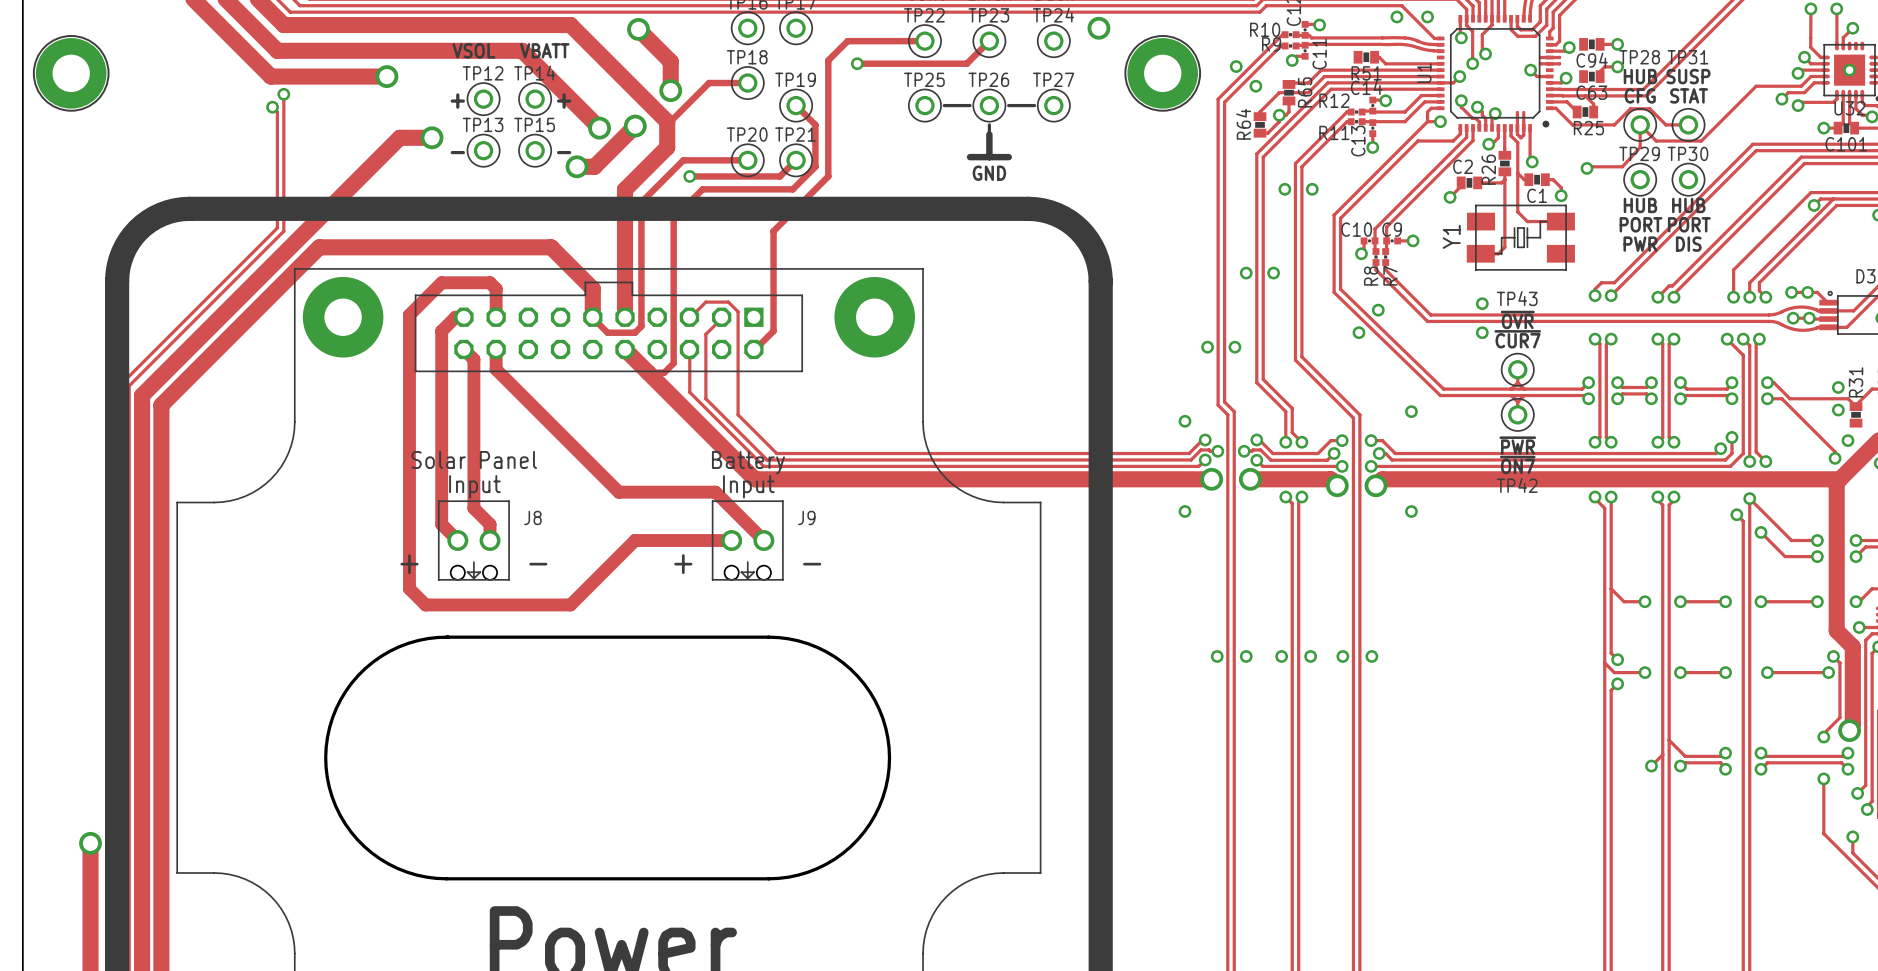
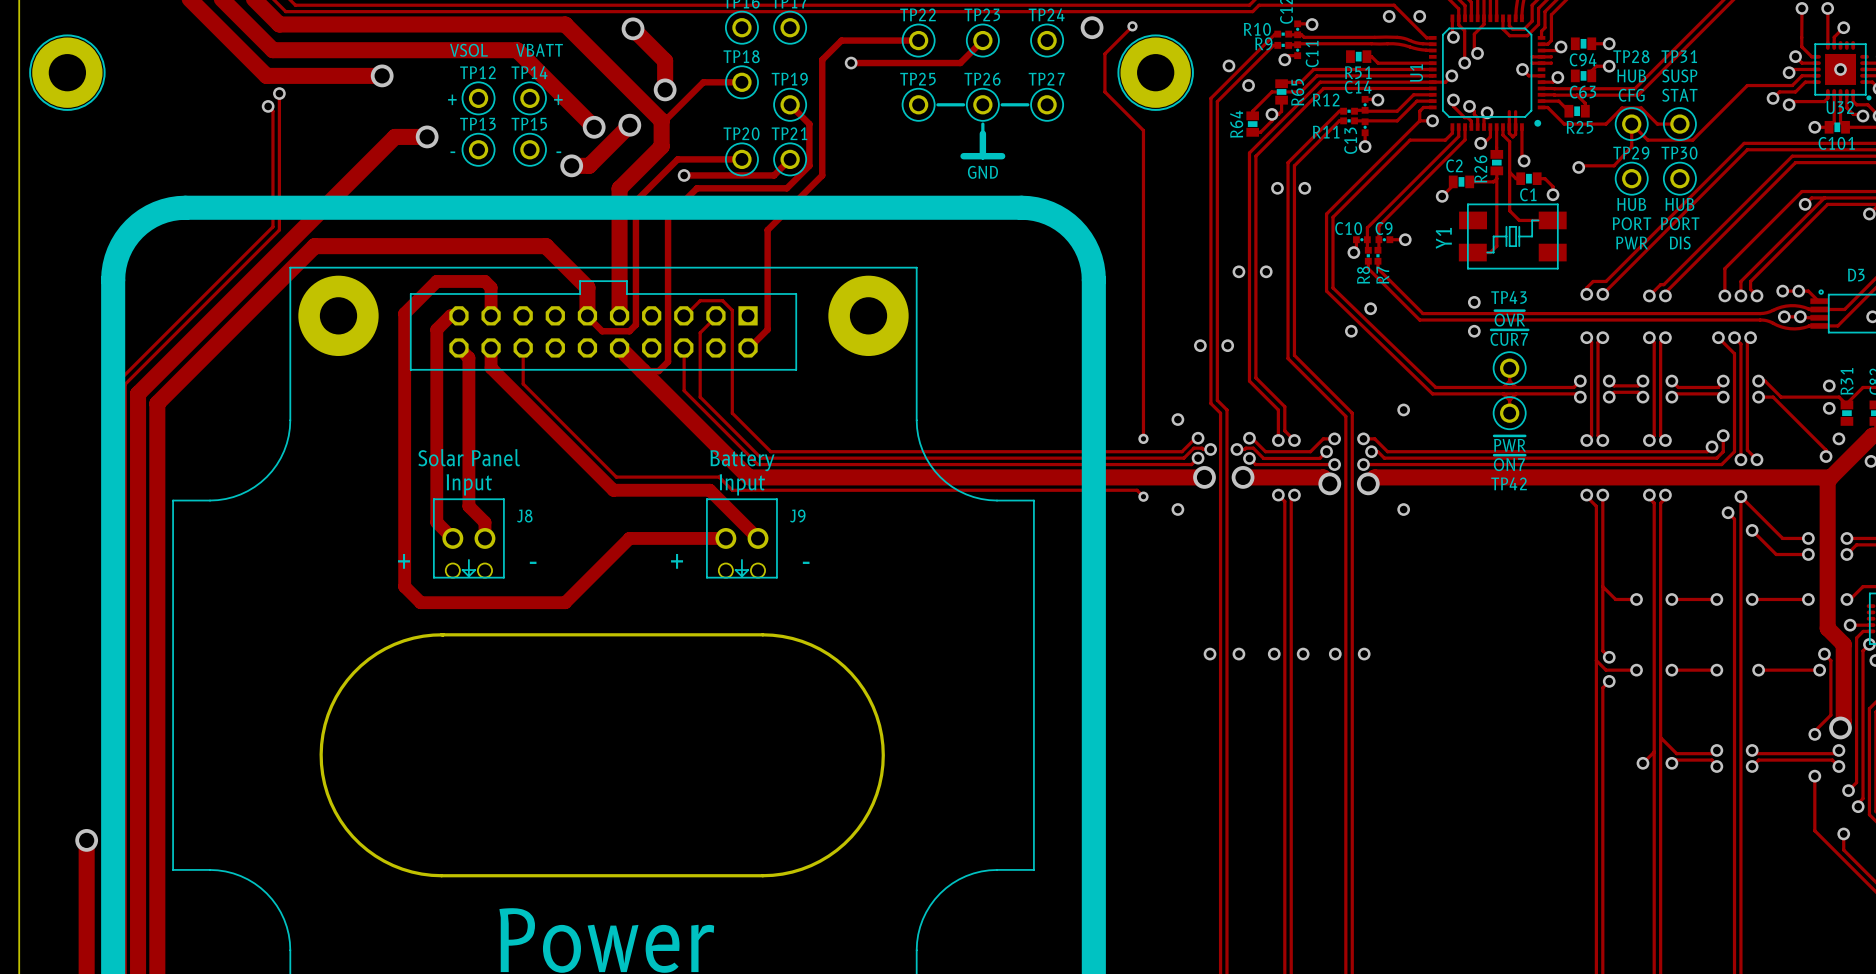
track: none -> (1132, 26) (1104, 53) (1104, 91) (1143, 130) (1143, 438)
via: none -> (1132, 26)
track: none -> (523, 347) (523, 383) (616, 477) (719, 477) (732, 490) (1137, 490) (1143, 496)
via: none -> (1143, 438)
via: none -> (1143, 496)

